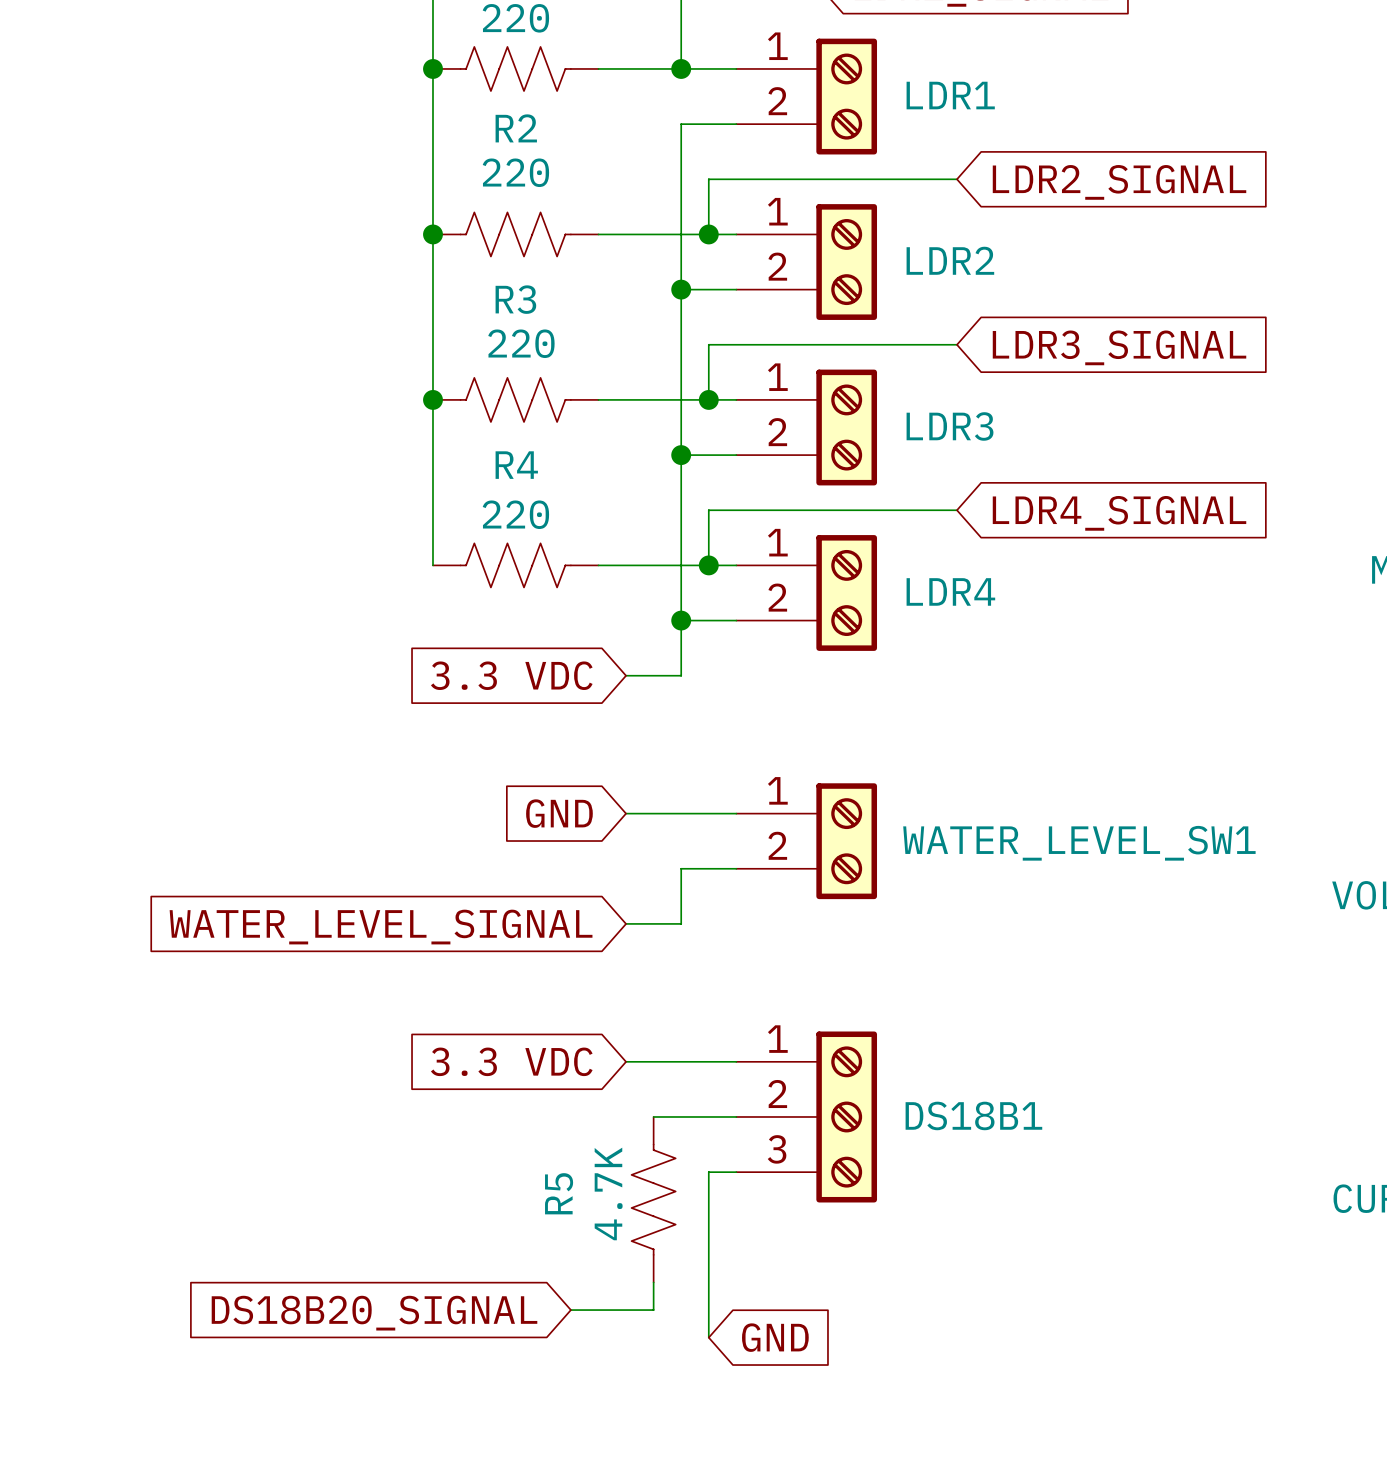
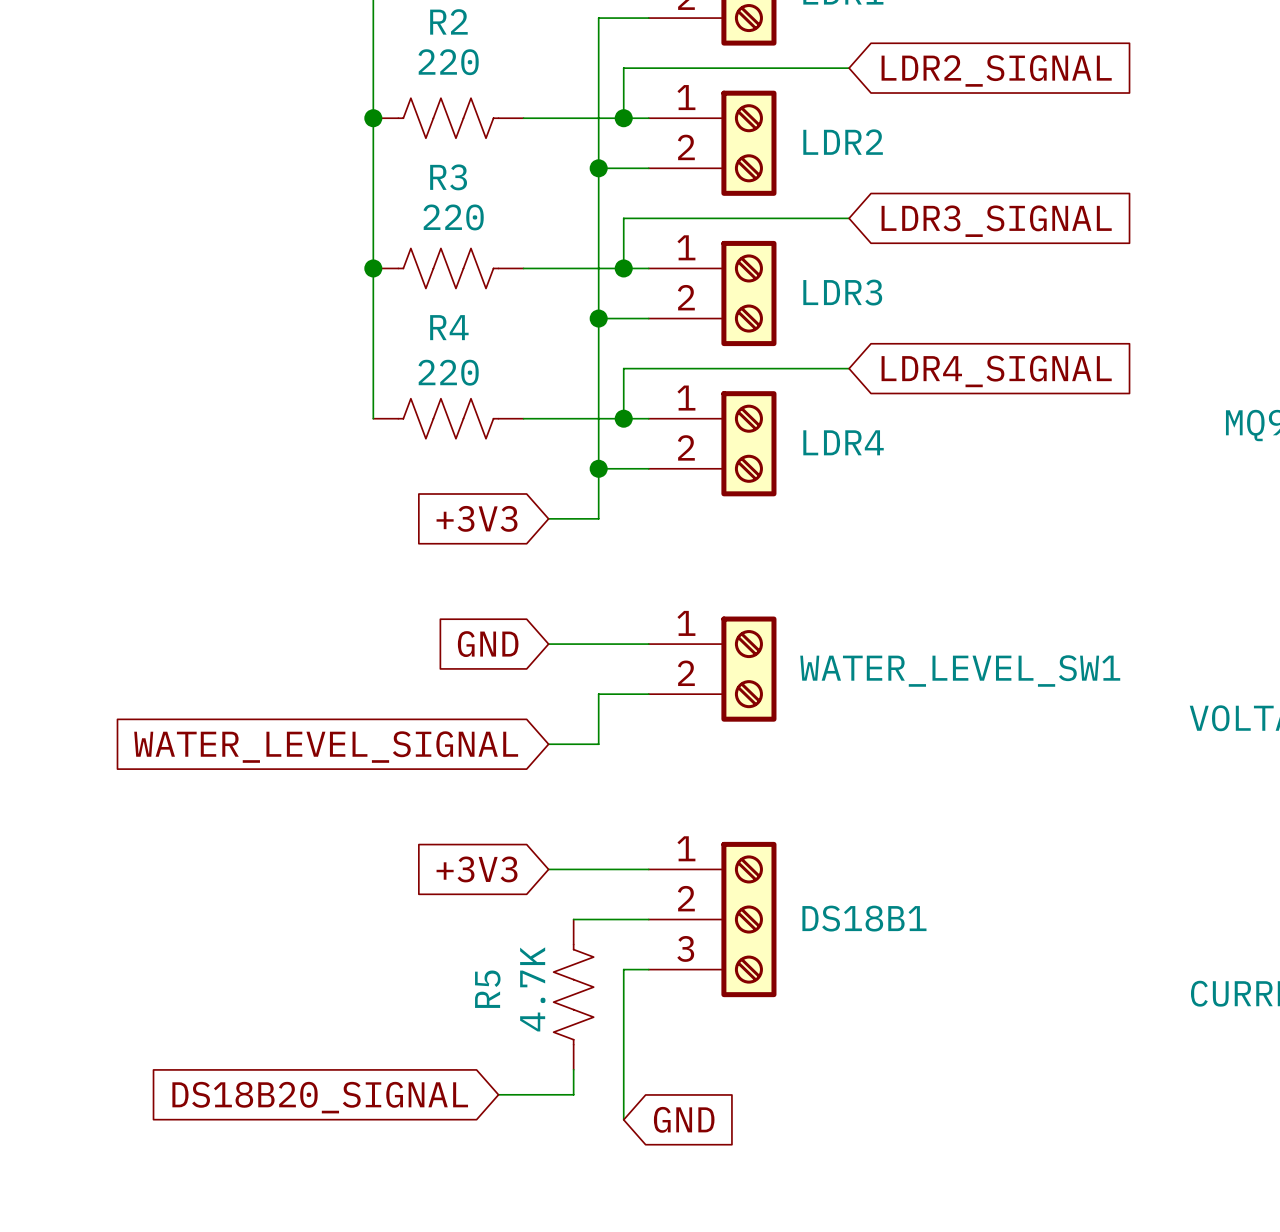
global label: 3.3 VDC (511, 675) -> +3V3 (477, 518)
global label: 3.3 VDC (511, 1061) -> +3V3 (477, 869)

